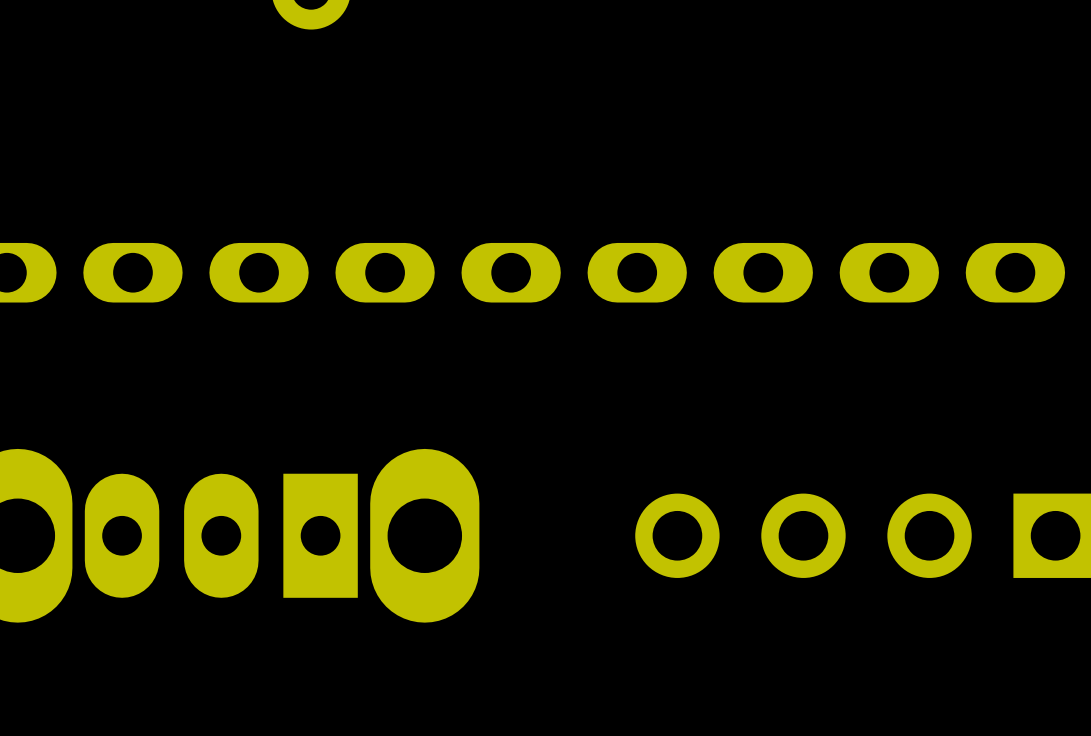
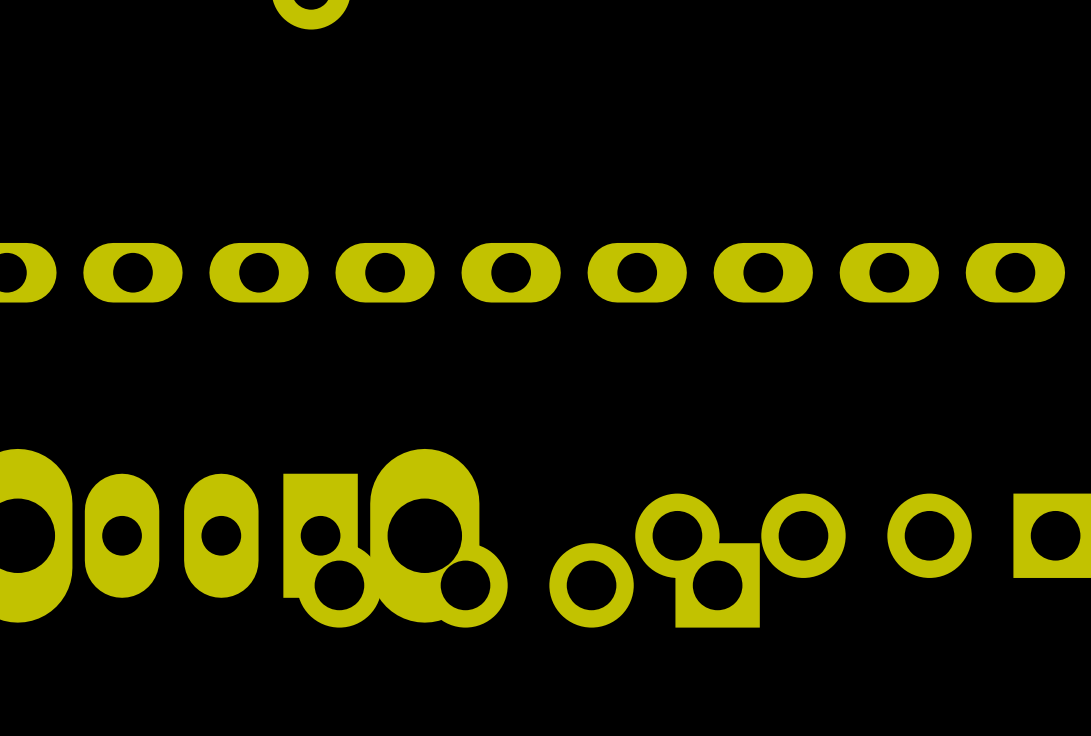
part: none -> (528, 585)

